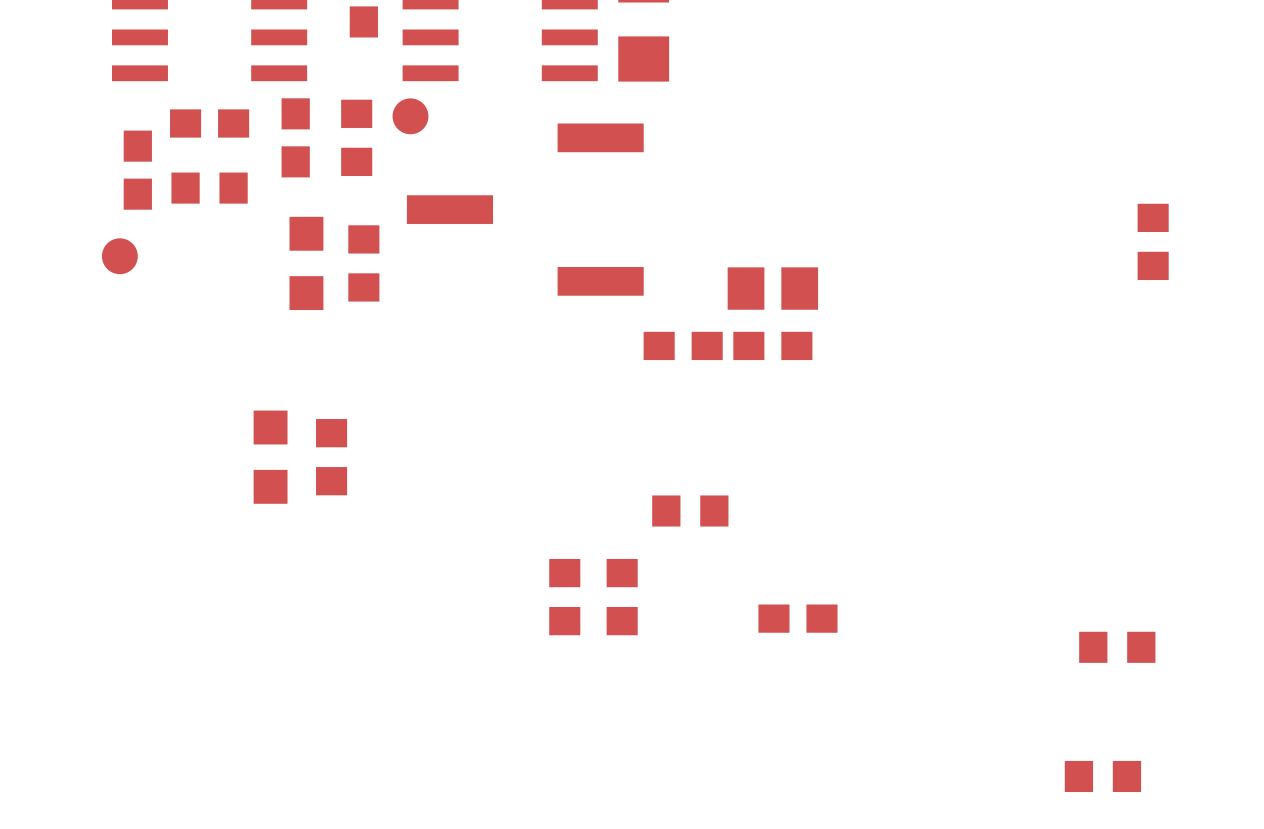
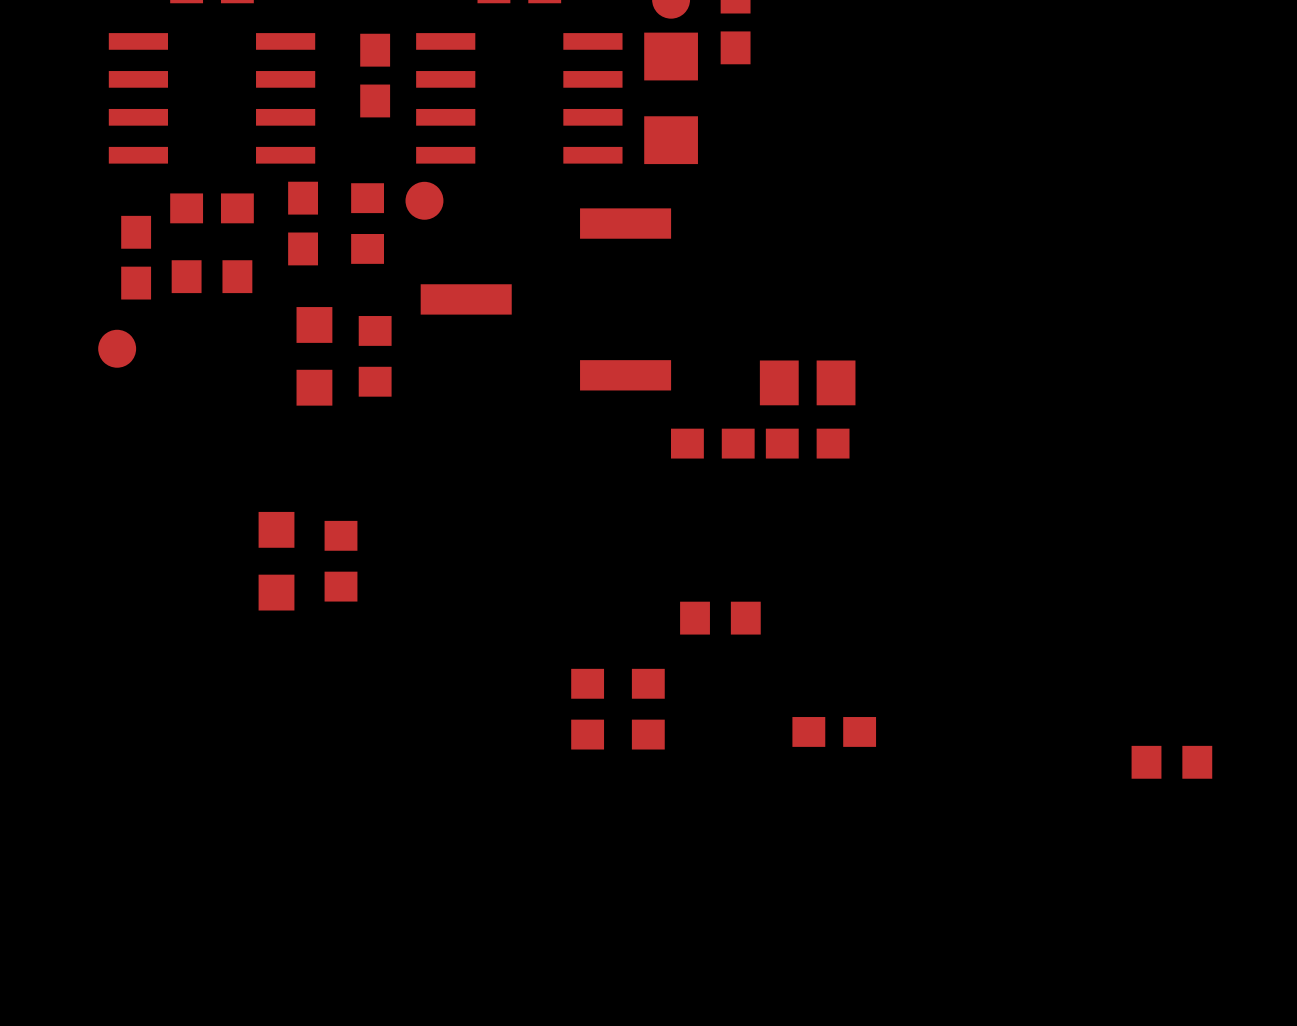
part: (1153, 241) -> none
part: (1102, 776) -> none

